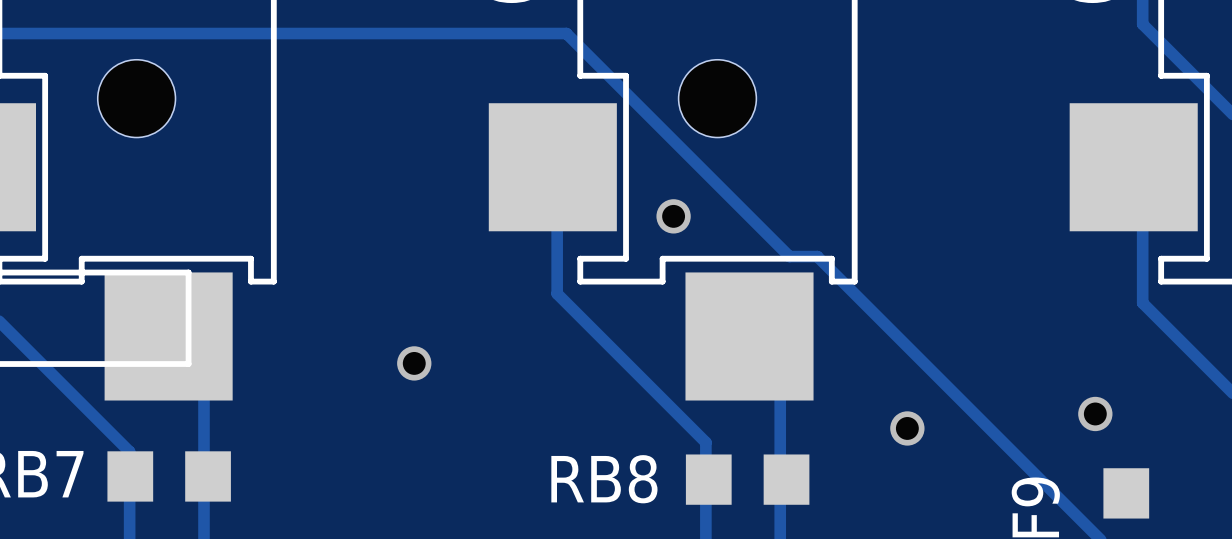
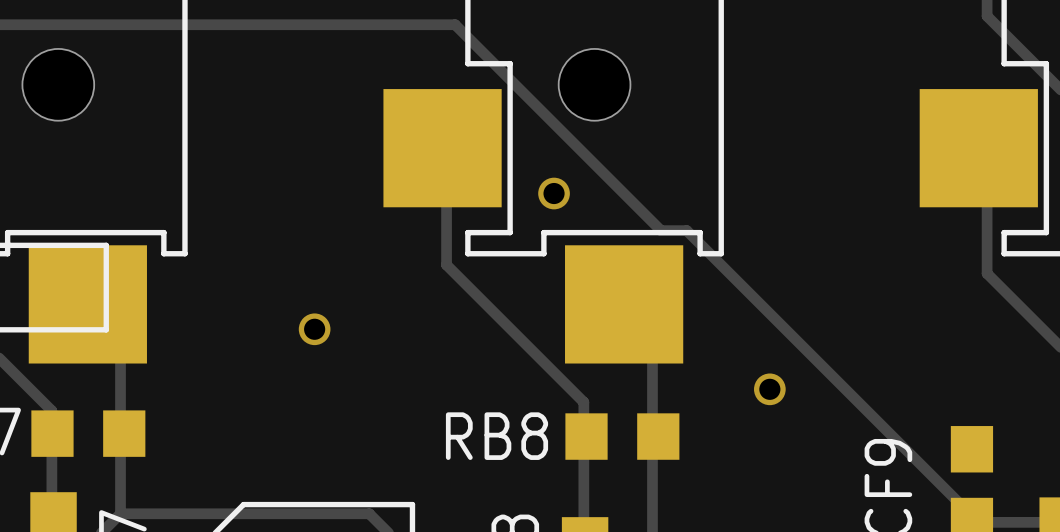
via: (1095, 413) -> none

